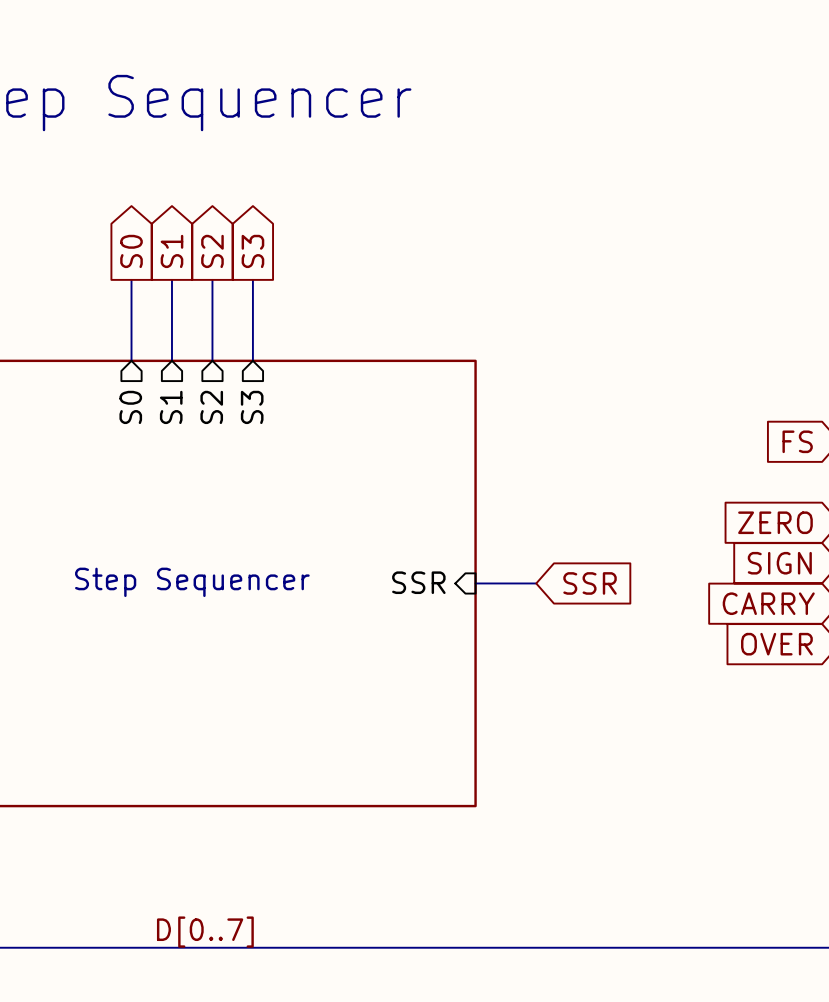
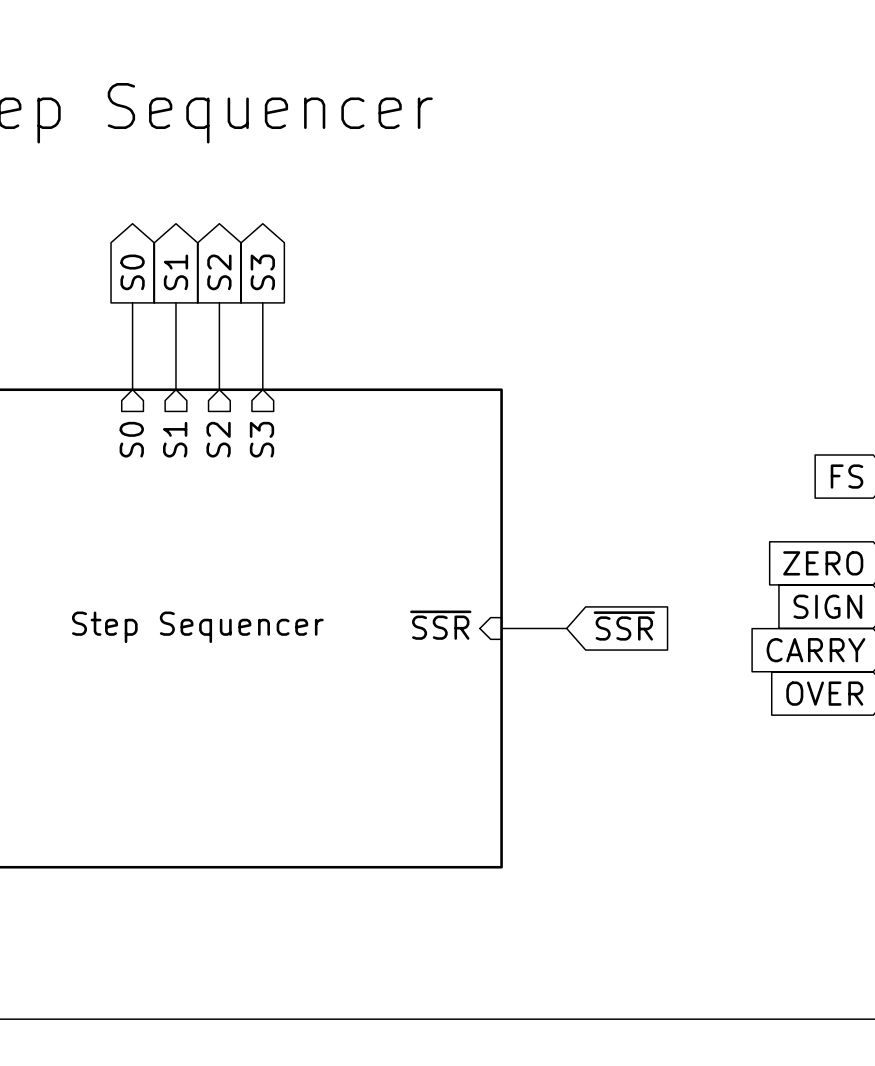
sheet pin: SSR (418, 582) -> ~{SSR} (440, 625)
global label: SSR (590, 583) -> ~{SSR} (624, 625)
label: D[0..7] (205, 932) -> none

